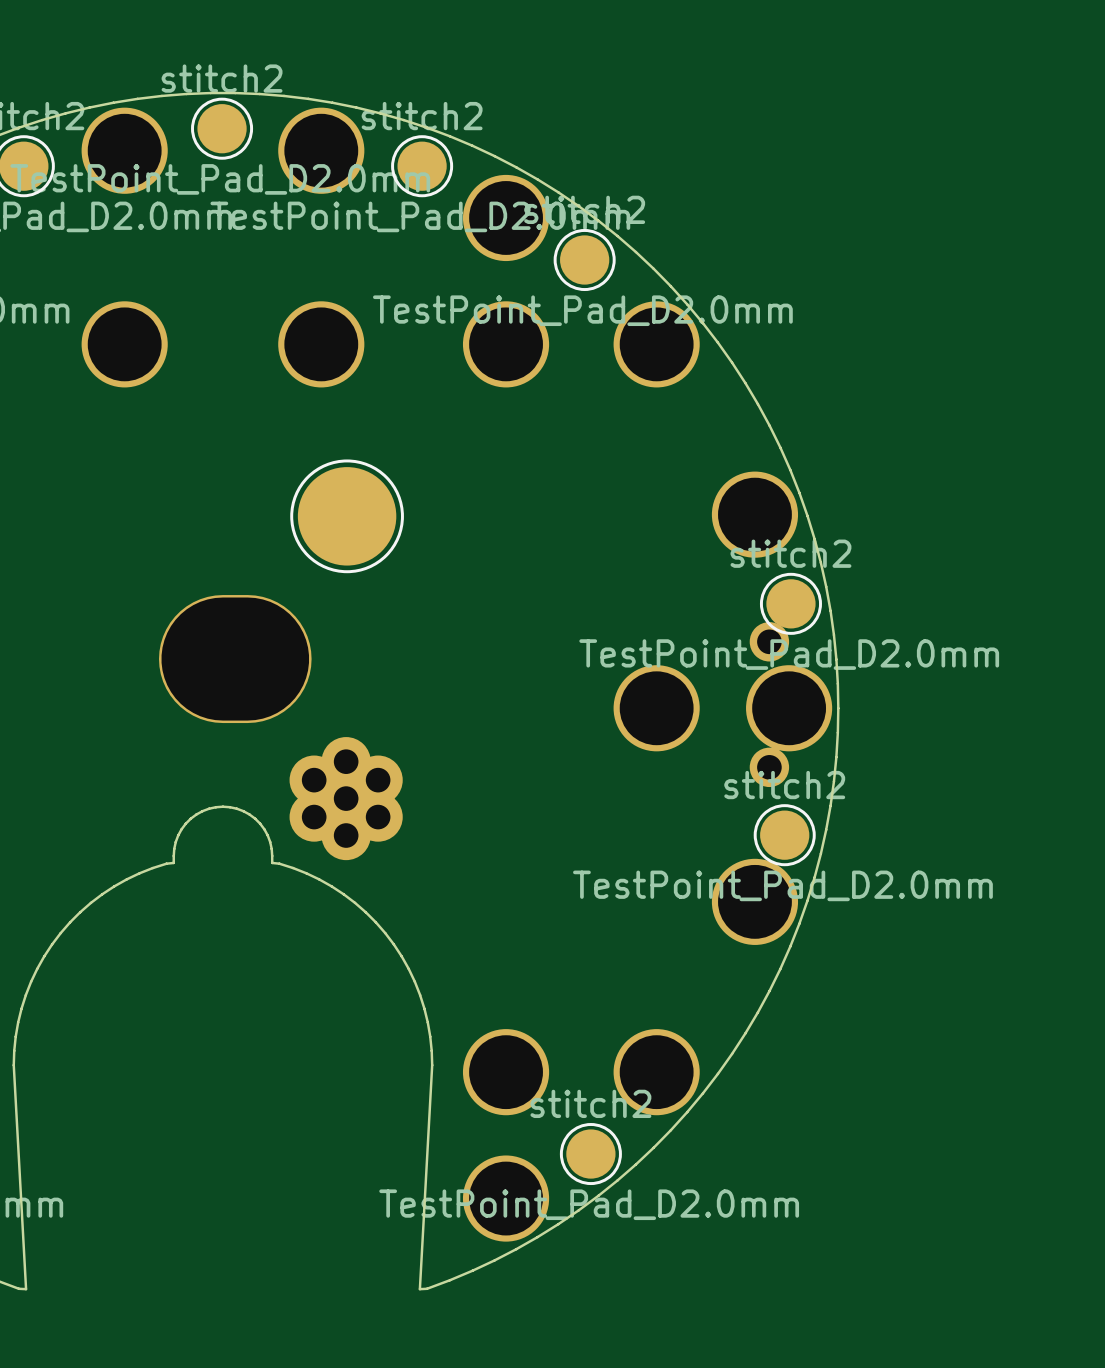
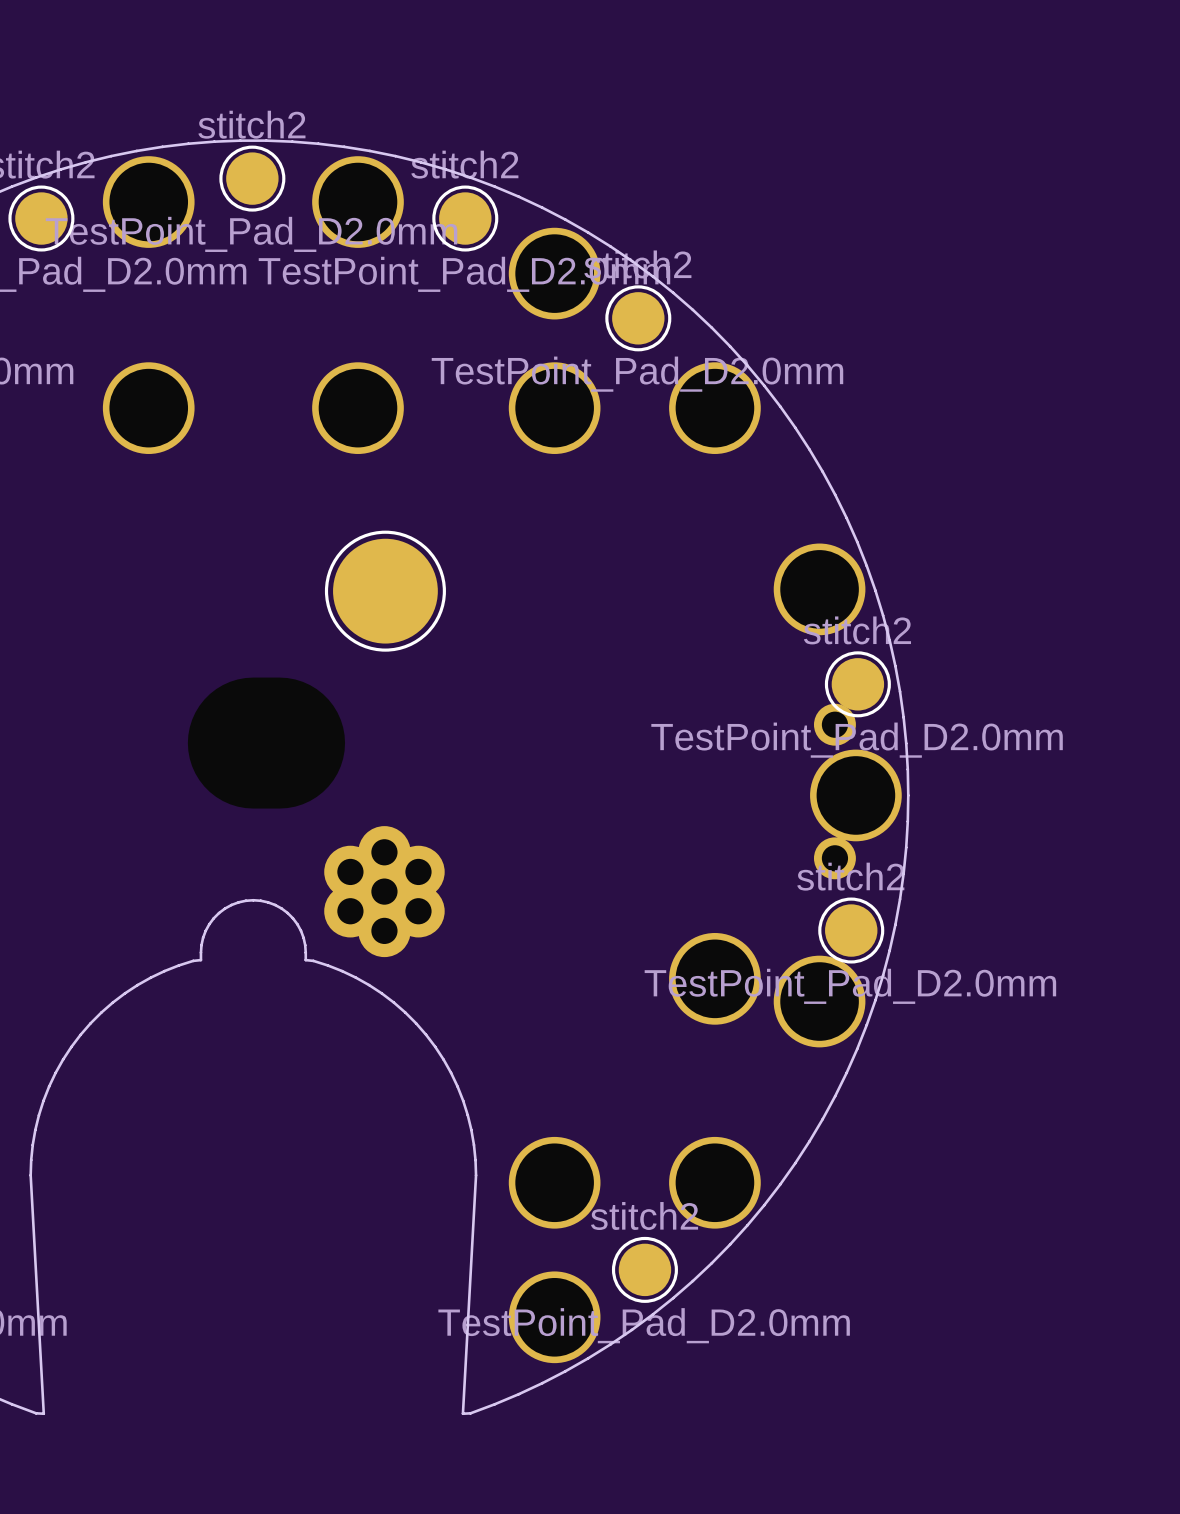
part footprint: [158, 595, 312, 724] -> [187, 677, 346, 809]
part position: (656, 708) -> (714, 978)

